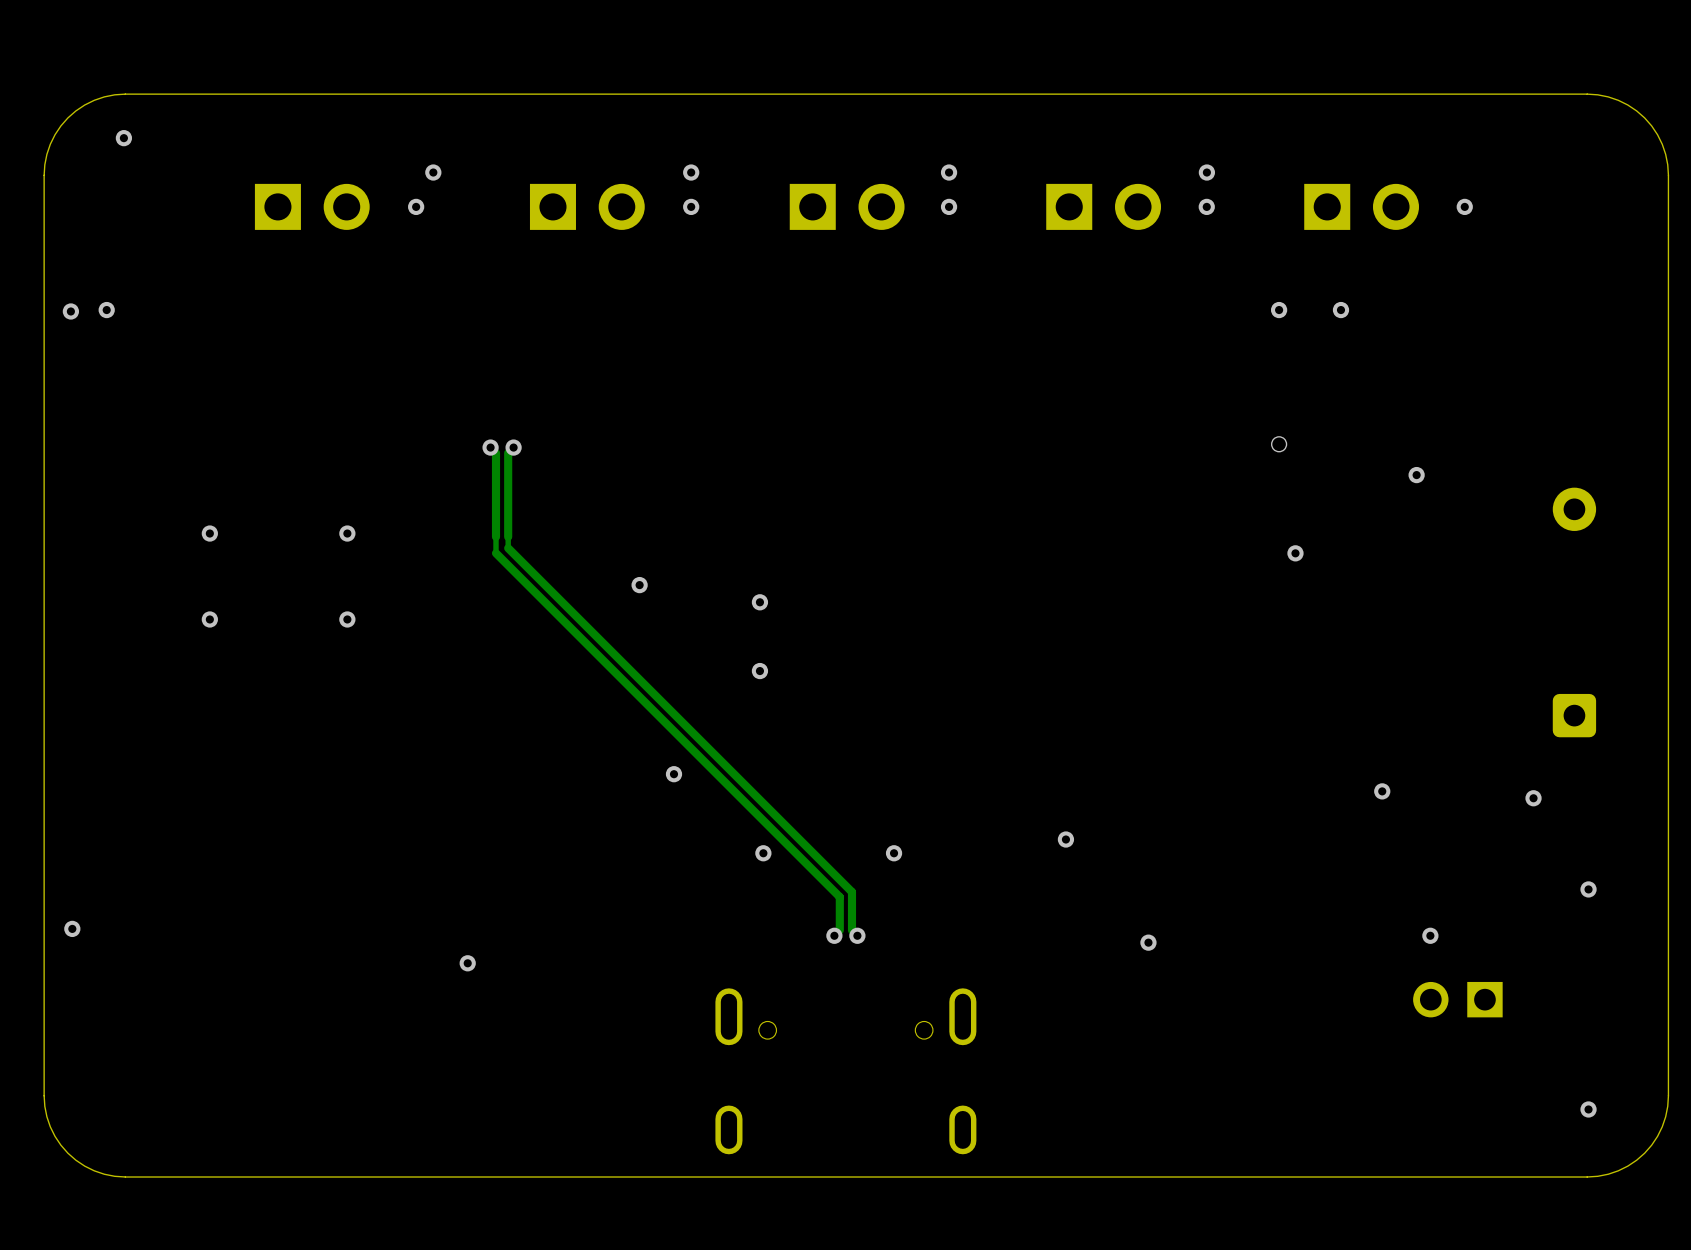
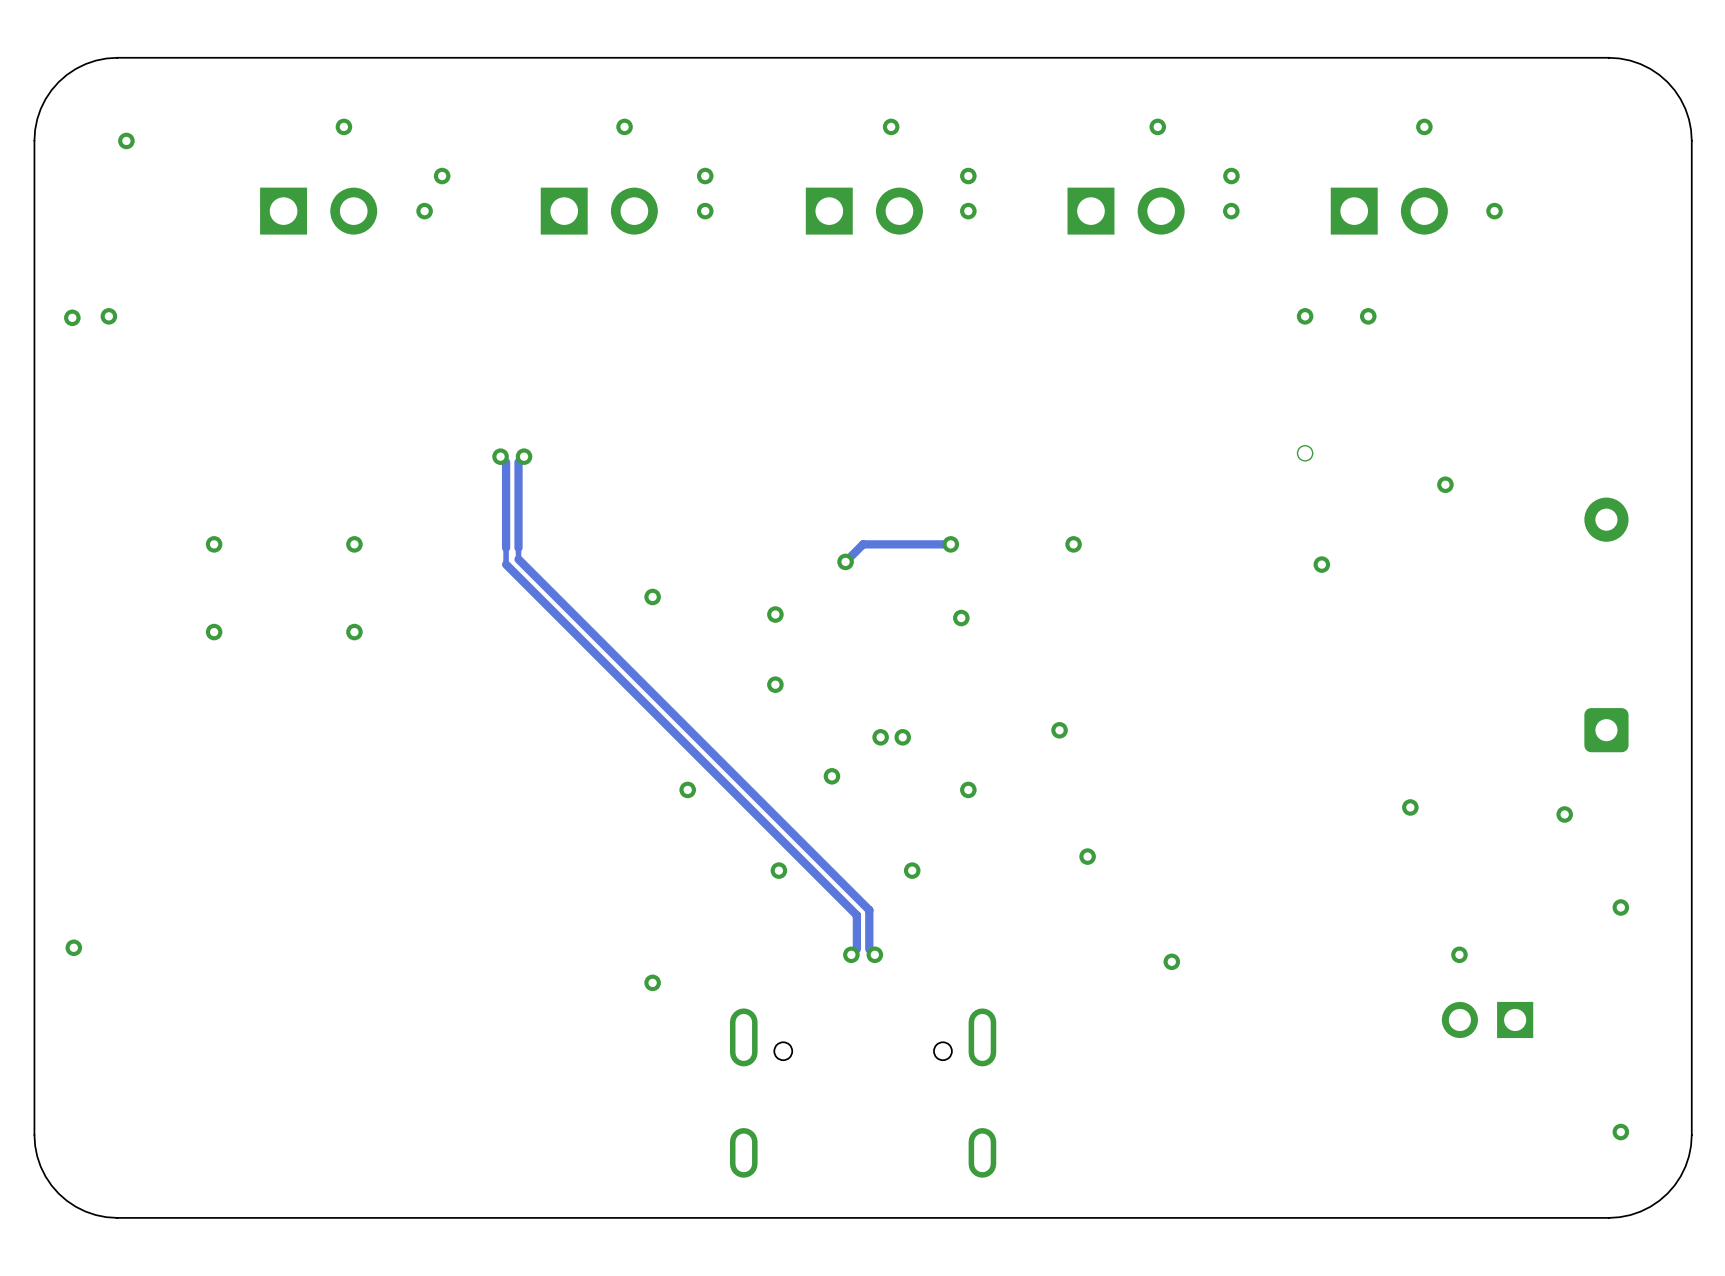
board edge: (1587, 94) (125, 94) (94, 100) (75, 110) (60, 125) (50, 144) (44, 175) (44, 1095) (46, 1116) (60, 1145) (84, 1166) (104, 1174) (125, 1177) (1587, 1177) (1618, 1170) (1636, 1160) (1651, 1145) (1662, 1126) (1668, 1095) (1668, 175) (1662, 144) (1644, 117) (1618, 100) (1587, 94) -> (1608, 57) (1640, 64) (1667, 82) (1685, 108) (1691, 140) (1691, 1135) (1685, 1166) (1674, 1185) (1659, 1200) (1640, 1211) (1608, 1217) (117, 1217) (85, 1211) (66, 1200) (51, 1185) (37, 1156) (34, 1135) (34, 140) (37, 119) (45, 99) (66, 74) (85, 64) (117, 57) (1608, 57)
via: none -> (343, 126)
via: none -> (624, 126)
via: none -> (891, 126)
via: none -> (1157, 126)
via: none -> (1424, 126)
track: none -> (950, 544) (863, 544) (845, 561)
via: none -> (950, 544)
via: none -> (1073, 544)
via: none -> (845, 561)
via: none -> (961, 618)
via: none -> (1059, 730)
via: none -> (880, 737)
via: none -> (902, 737)
via: none -> (831, 776)
via: none -> (968, 789)
via: (467, 963) -> none
via: none -> (652, 982)

